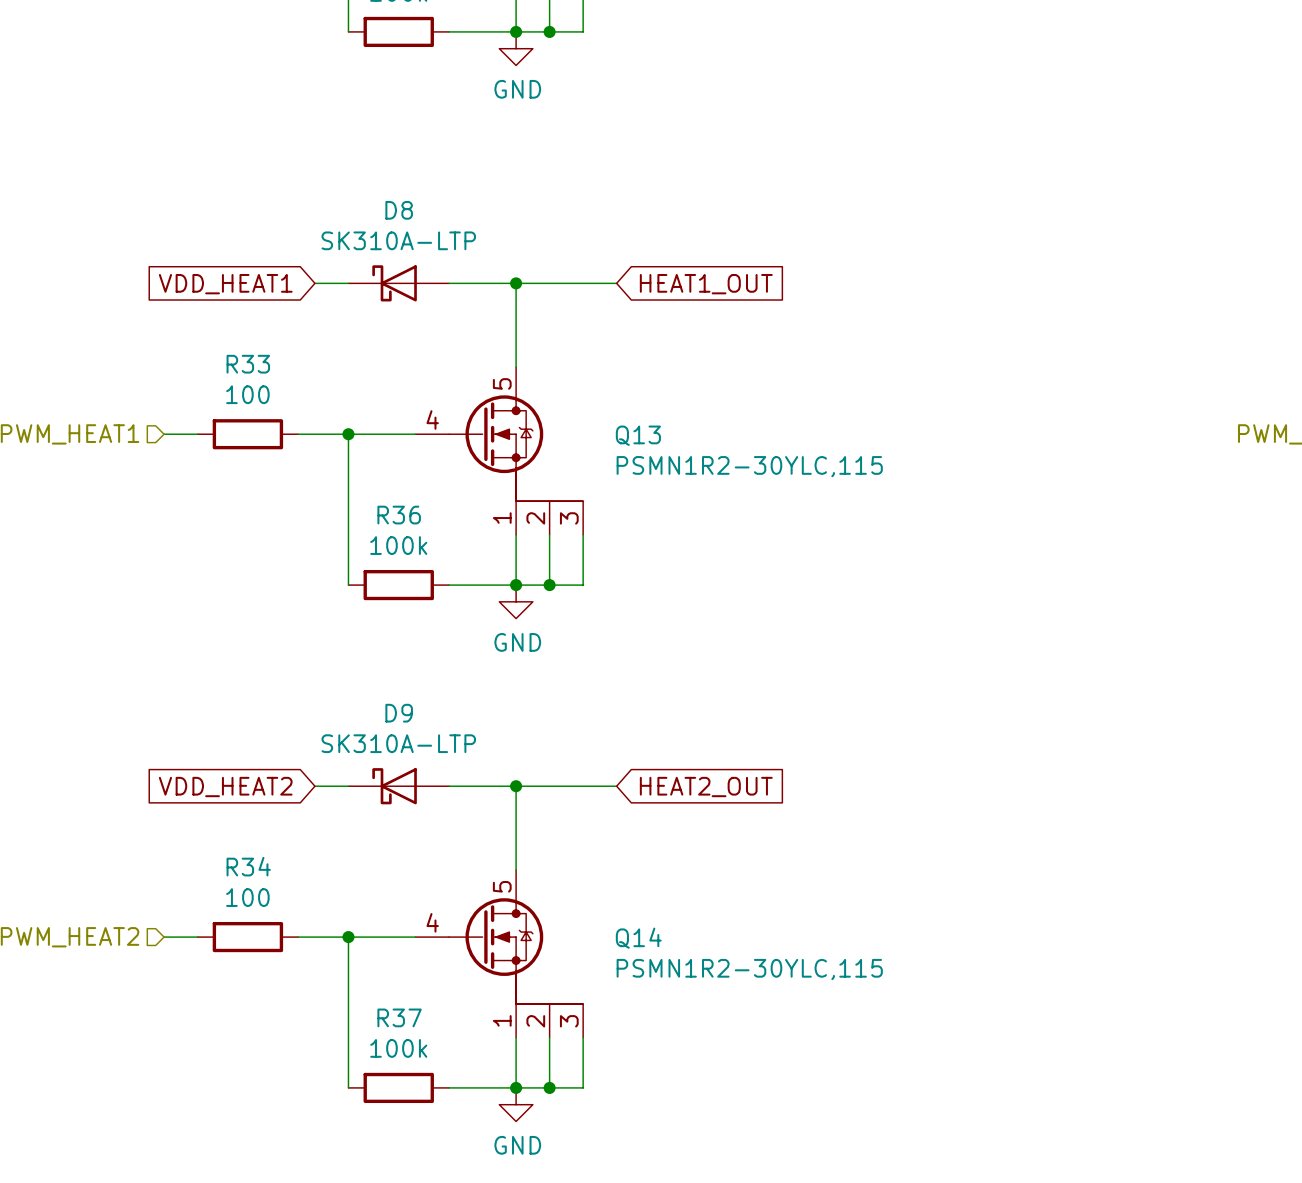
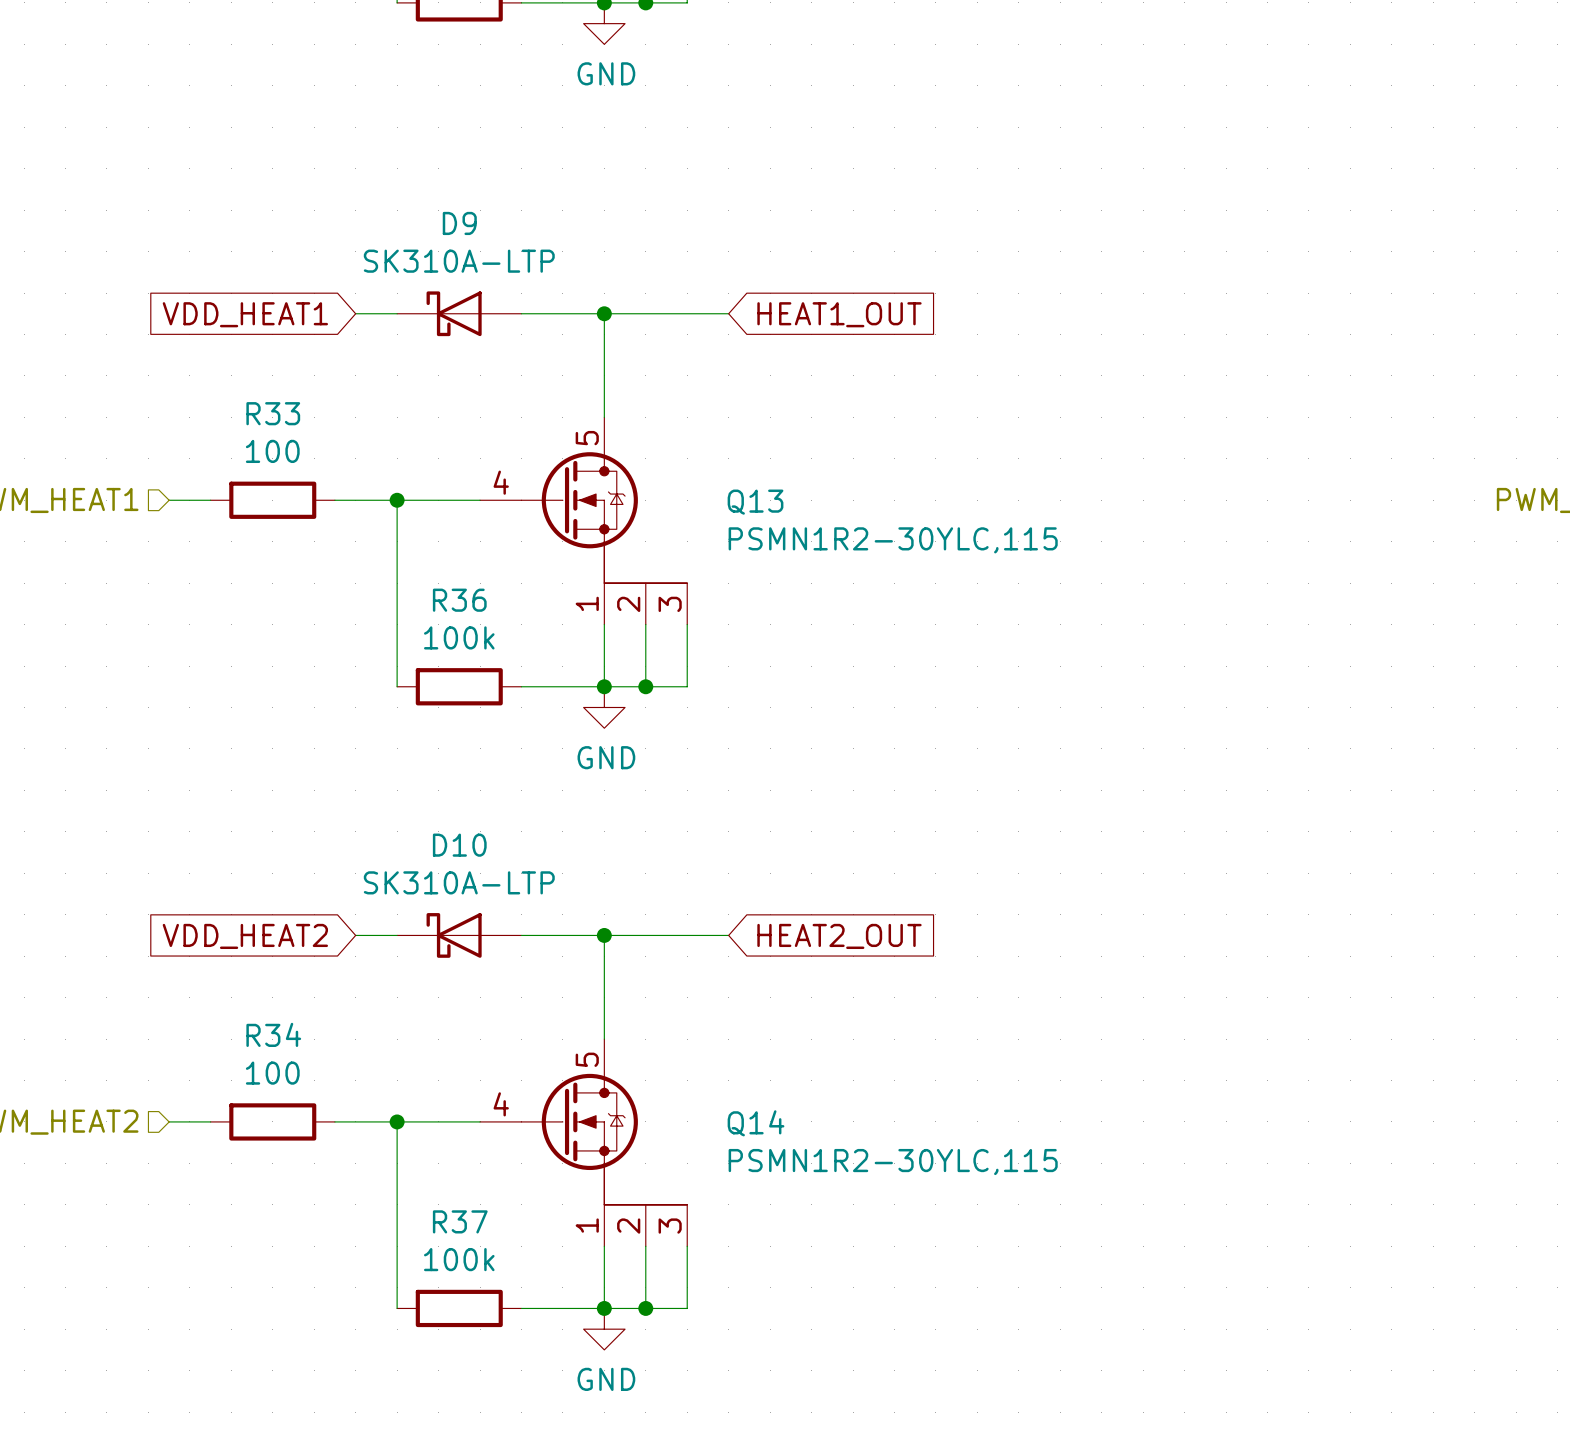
D8 name: D8 (399, 210) -> D9 (459, 223)
D9 name: D9 (399, 713) -> D10 (459, 845)

